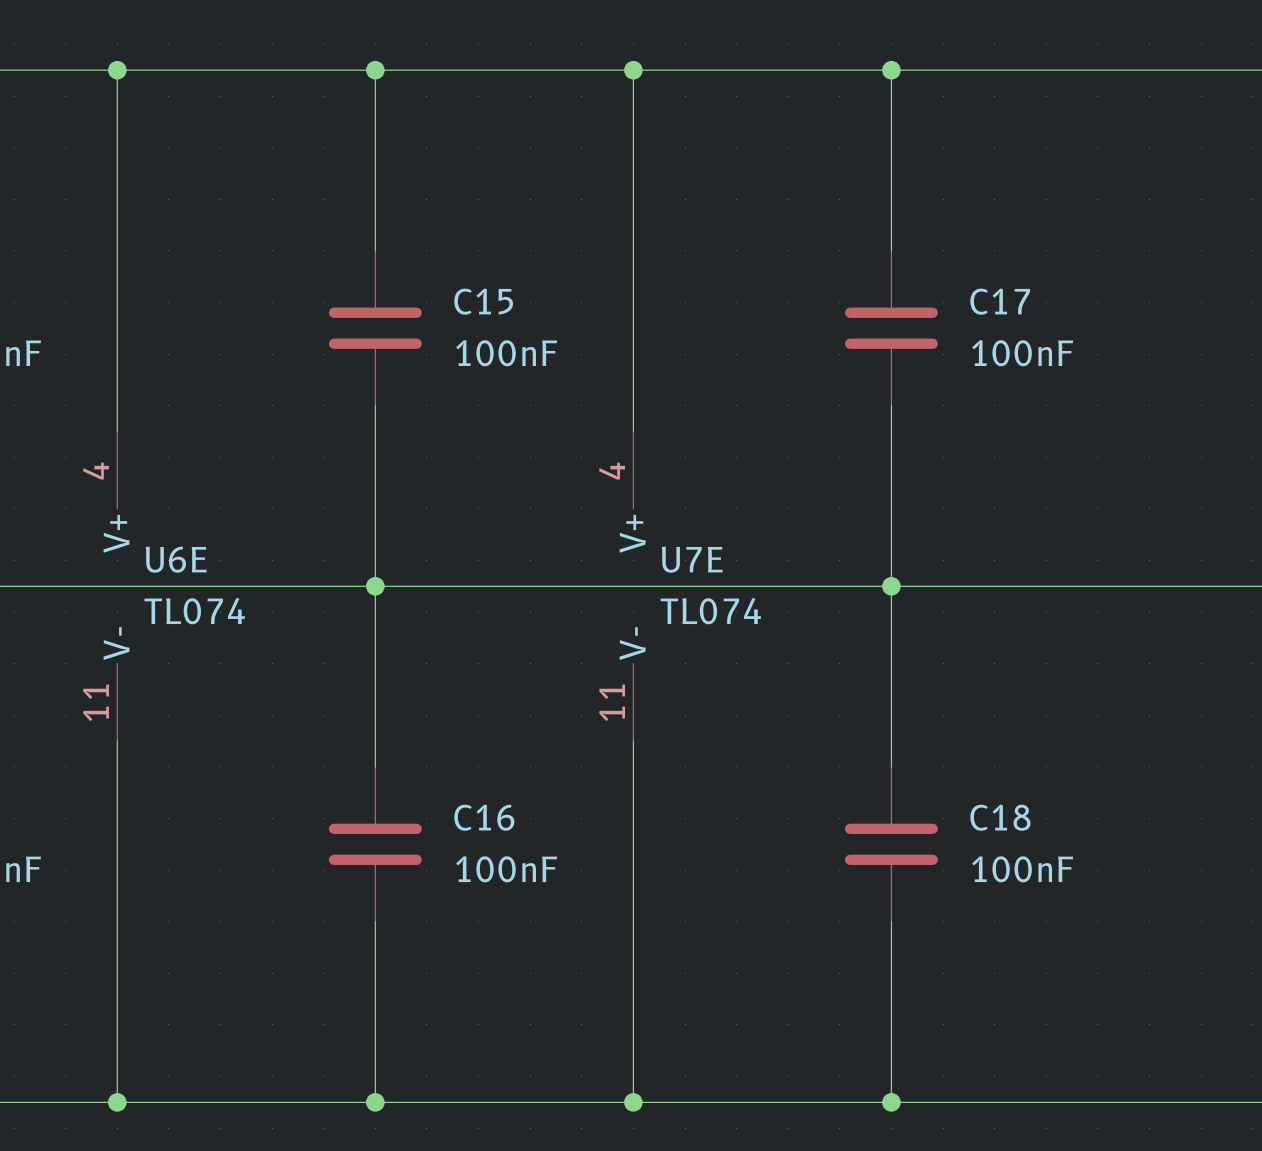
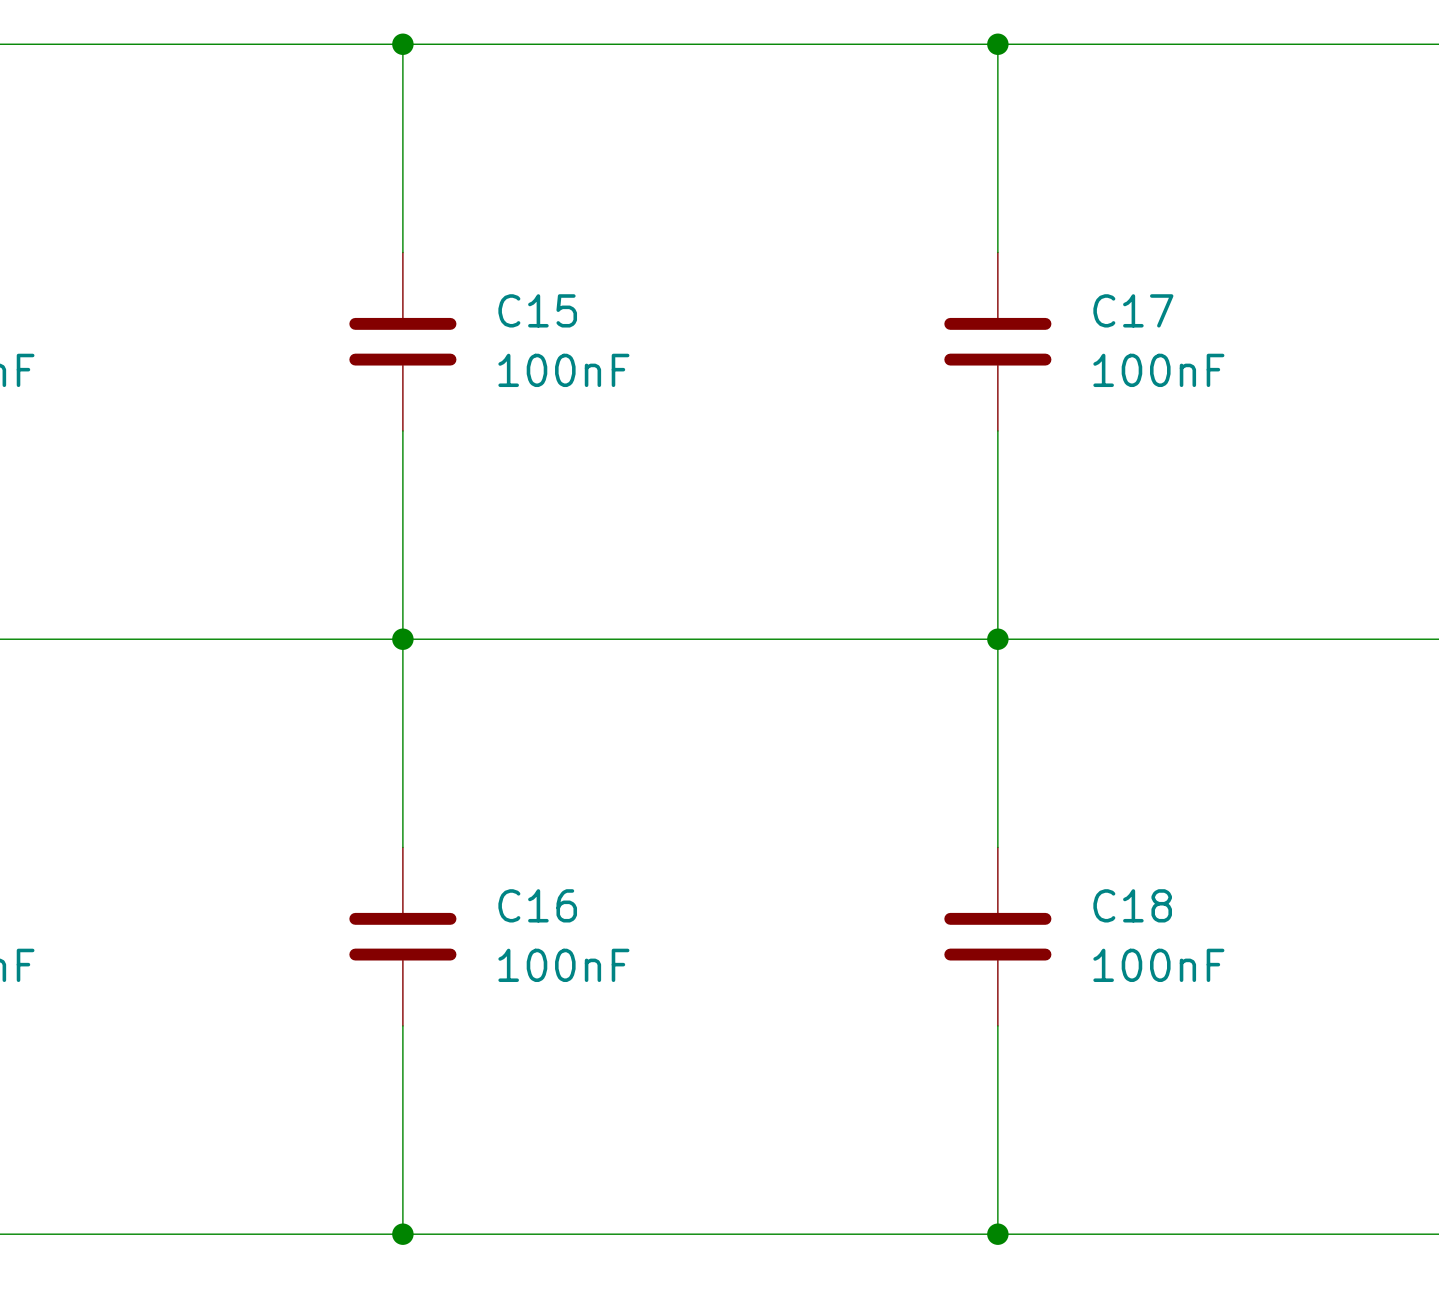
wire: (117, 70) (117, 431) -> none
junction: (117, 70) -> none
wire: (633, 70) (633, 431) -> none
junction: (633, 70) -> none
U6E: TL074 (117, 586) -> none
U7E: TL074 (633, 586) -> none
wire: (117, 741) (117, 1102) -> none
wire: (633, 741) (633, 1102) -> none
junction: (117, 1102) -> none
junction: (633, 1102) -> none

